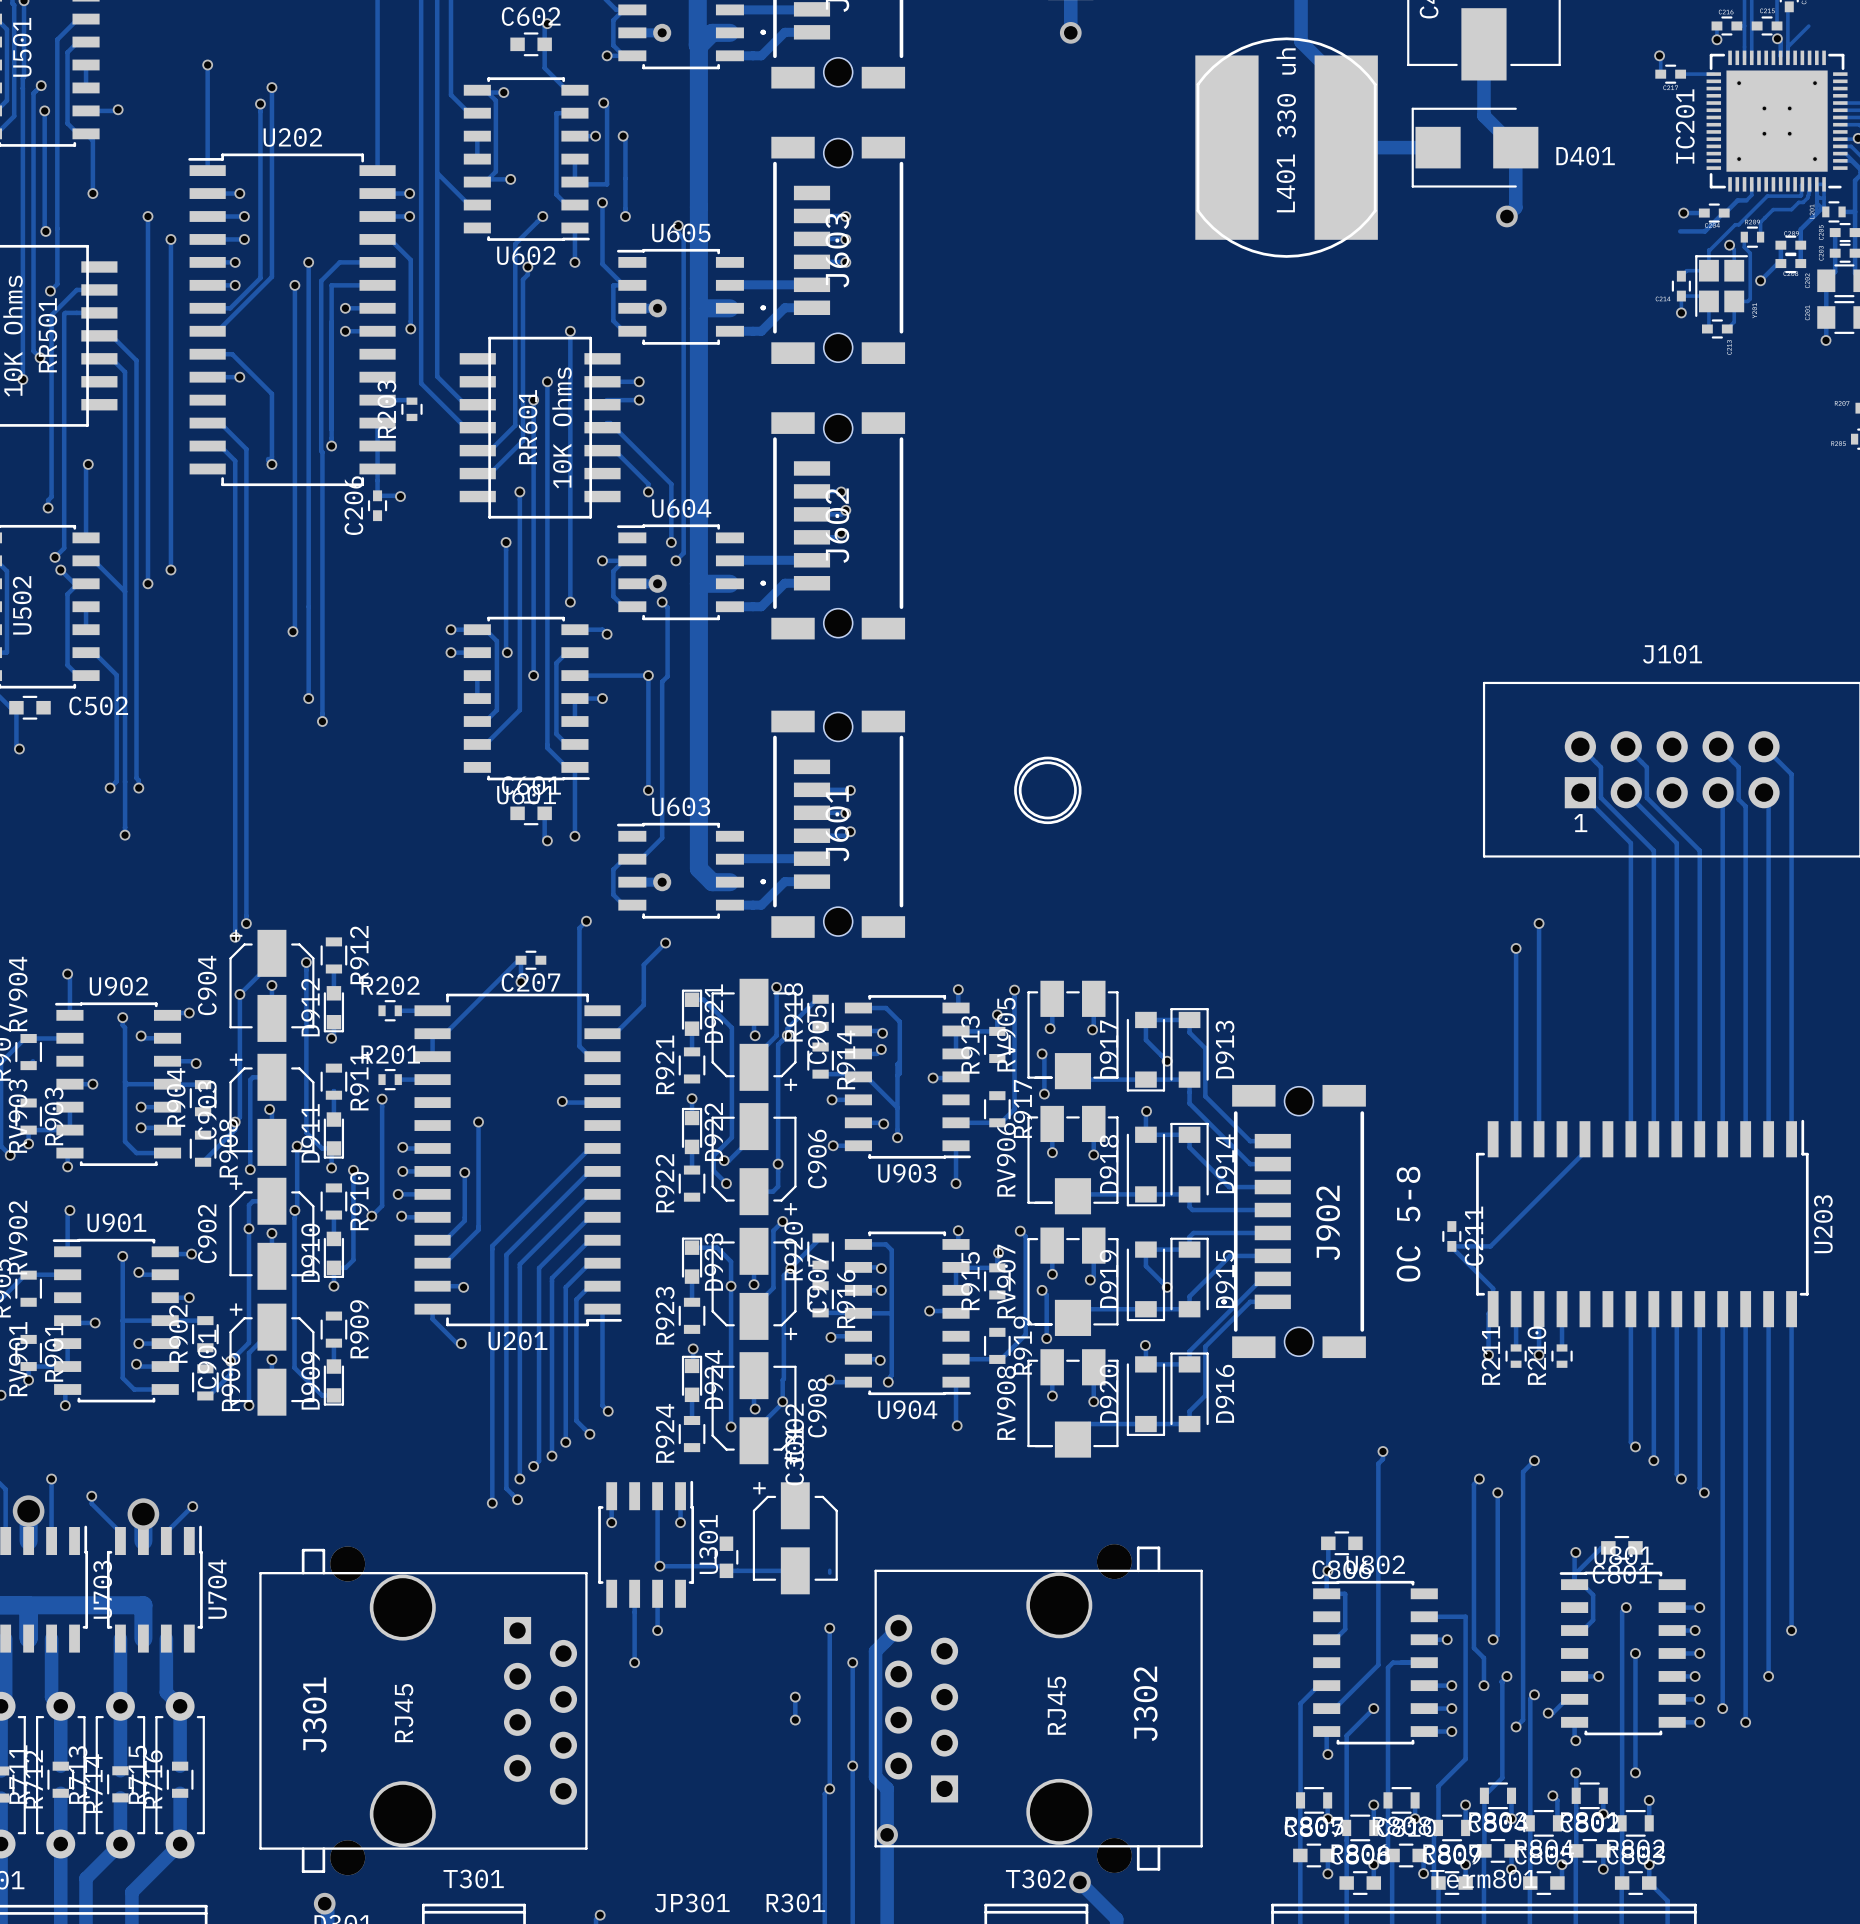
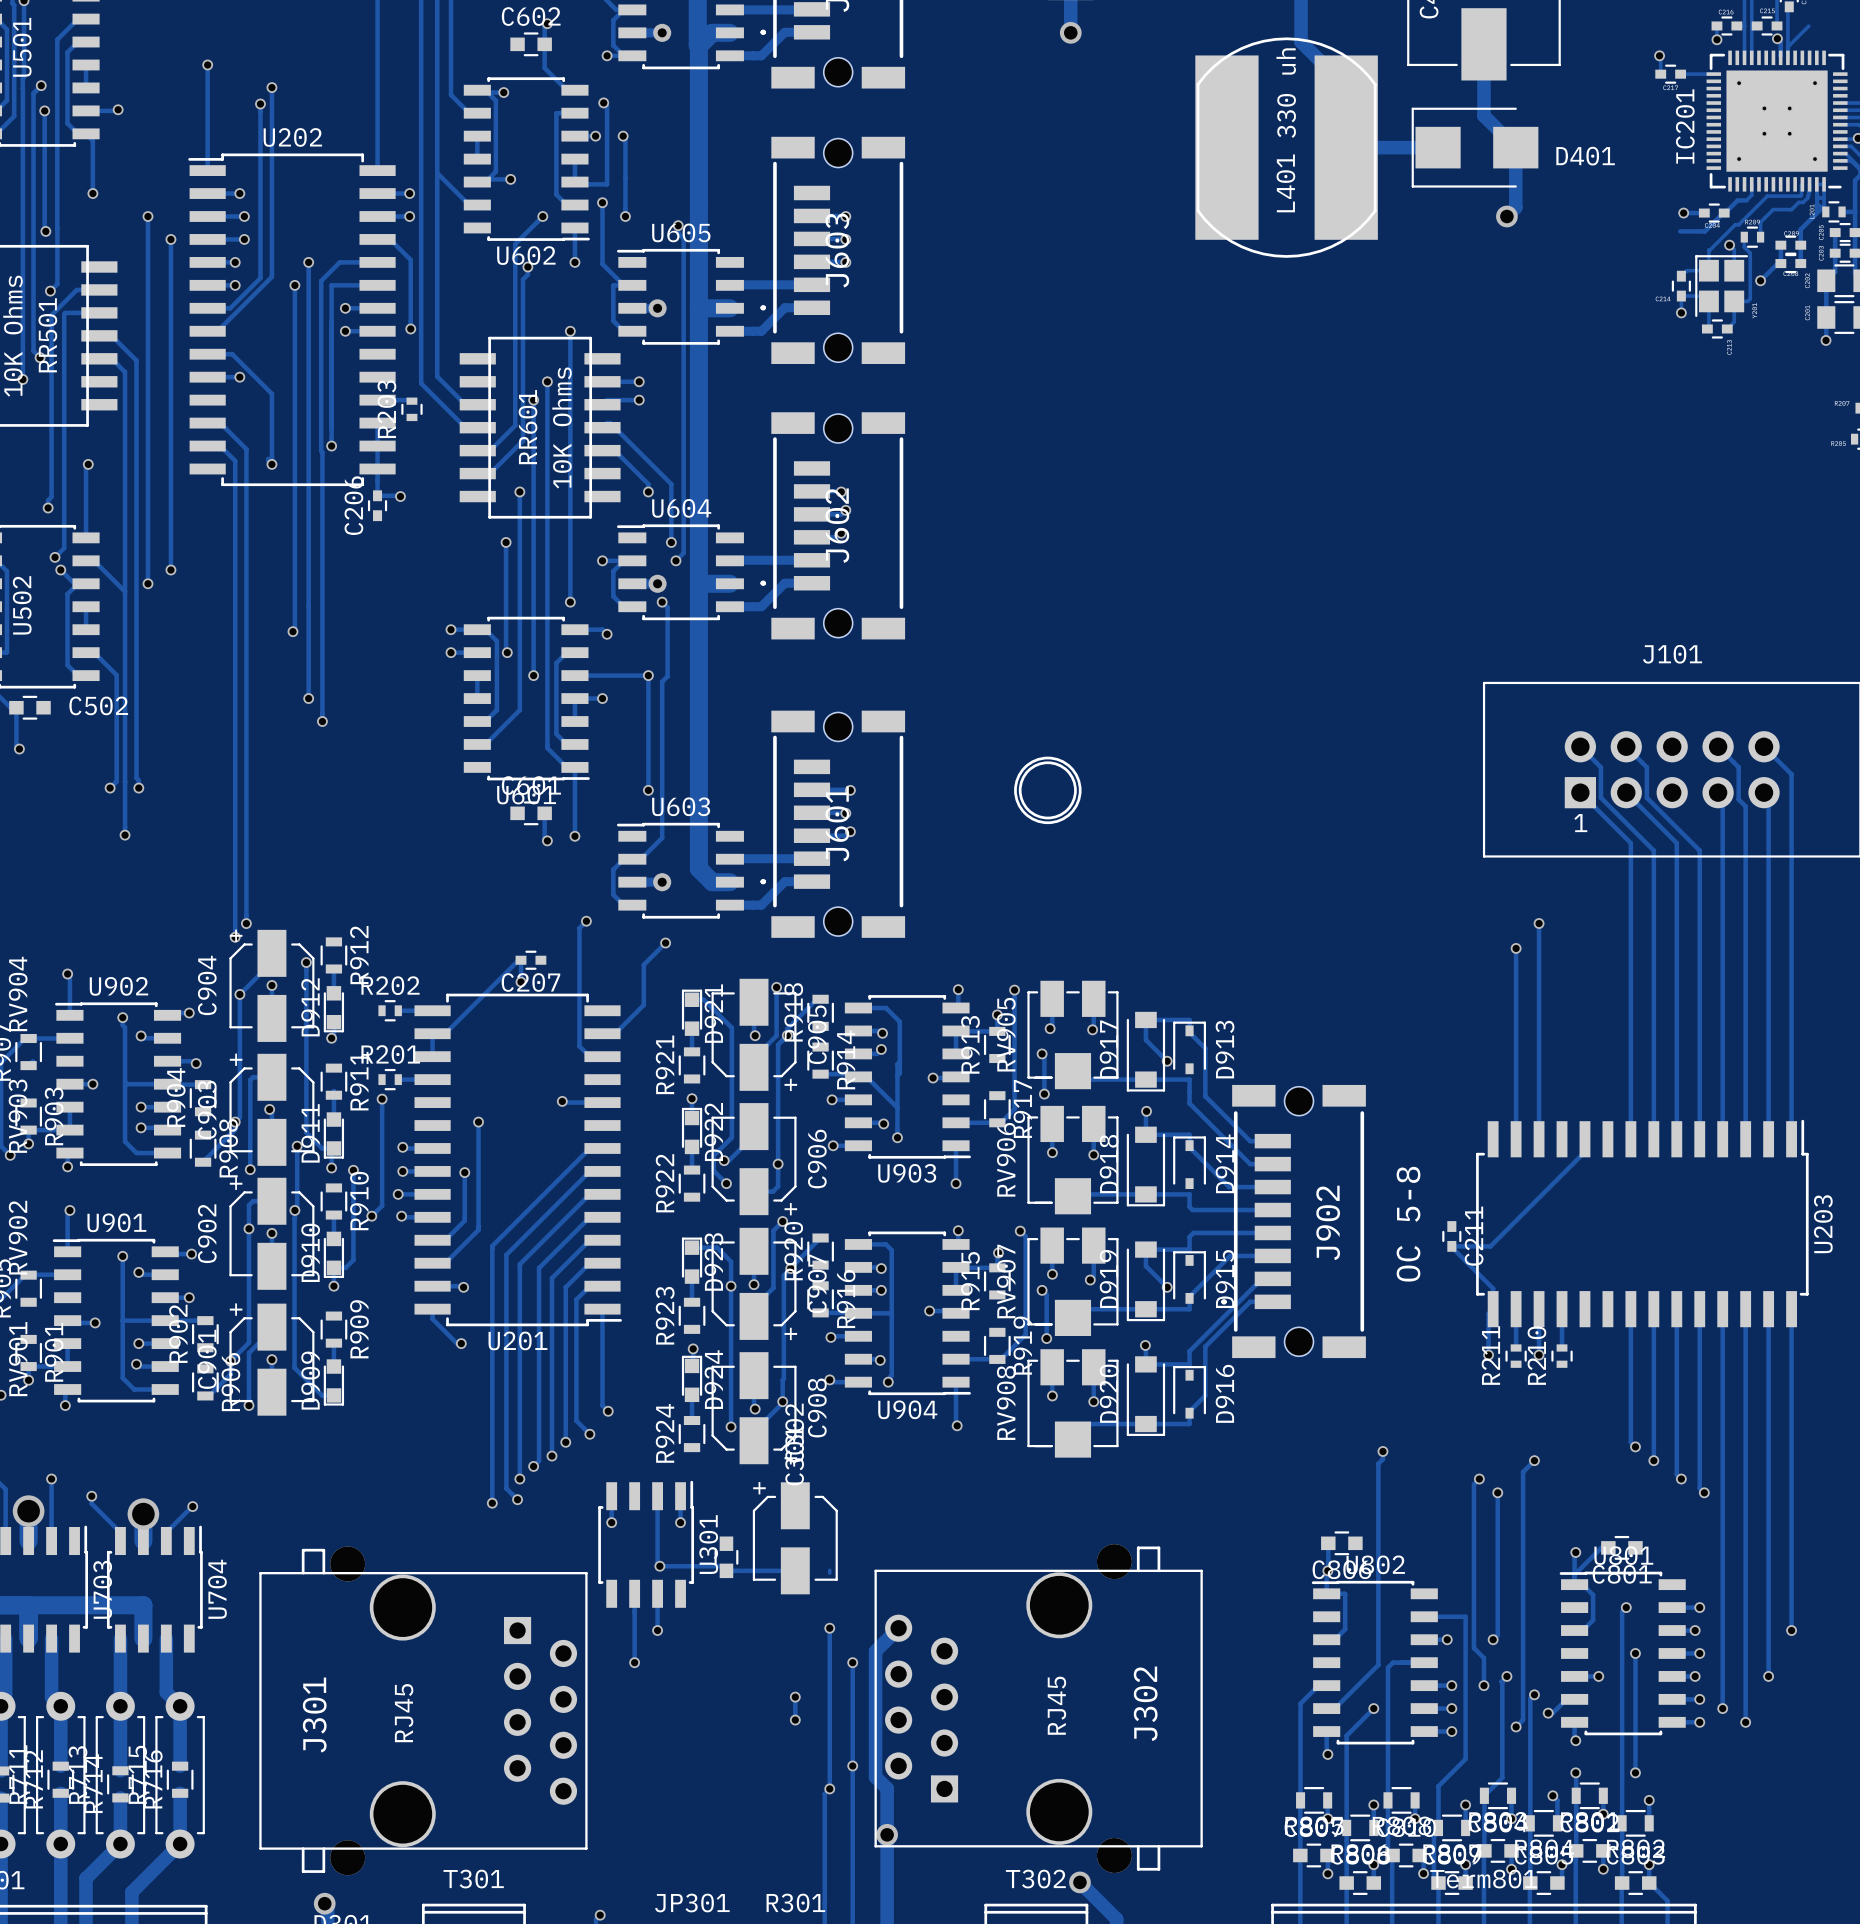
D913 footprint: [1170, 1008, 1209, 1088] -> [1173, 1021, 1207, 1075]
D914 footprint: [1170, 1122, 1209, 1203] -> [1173, 1136, 1207, 1190]
D915 footprint: [1170, 1237, 1209, 1318] -> [1173, 1251, 1207, 1304]
D916 footprint: [1170, 1352, 1209, 1433] -> [1173, 1366, 1207, 1419]

